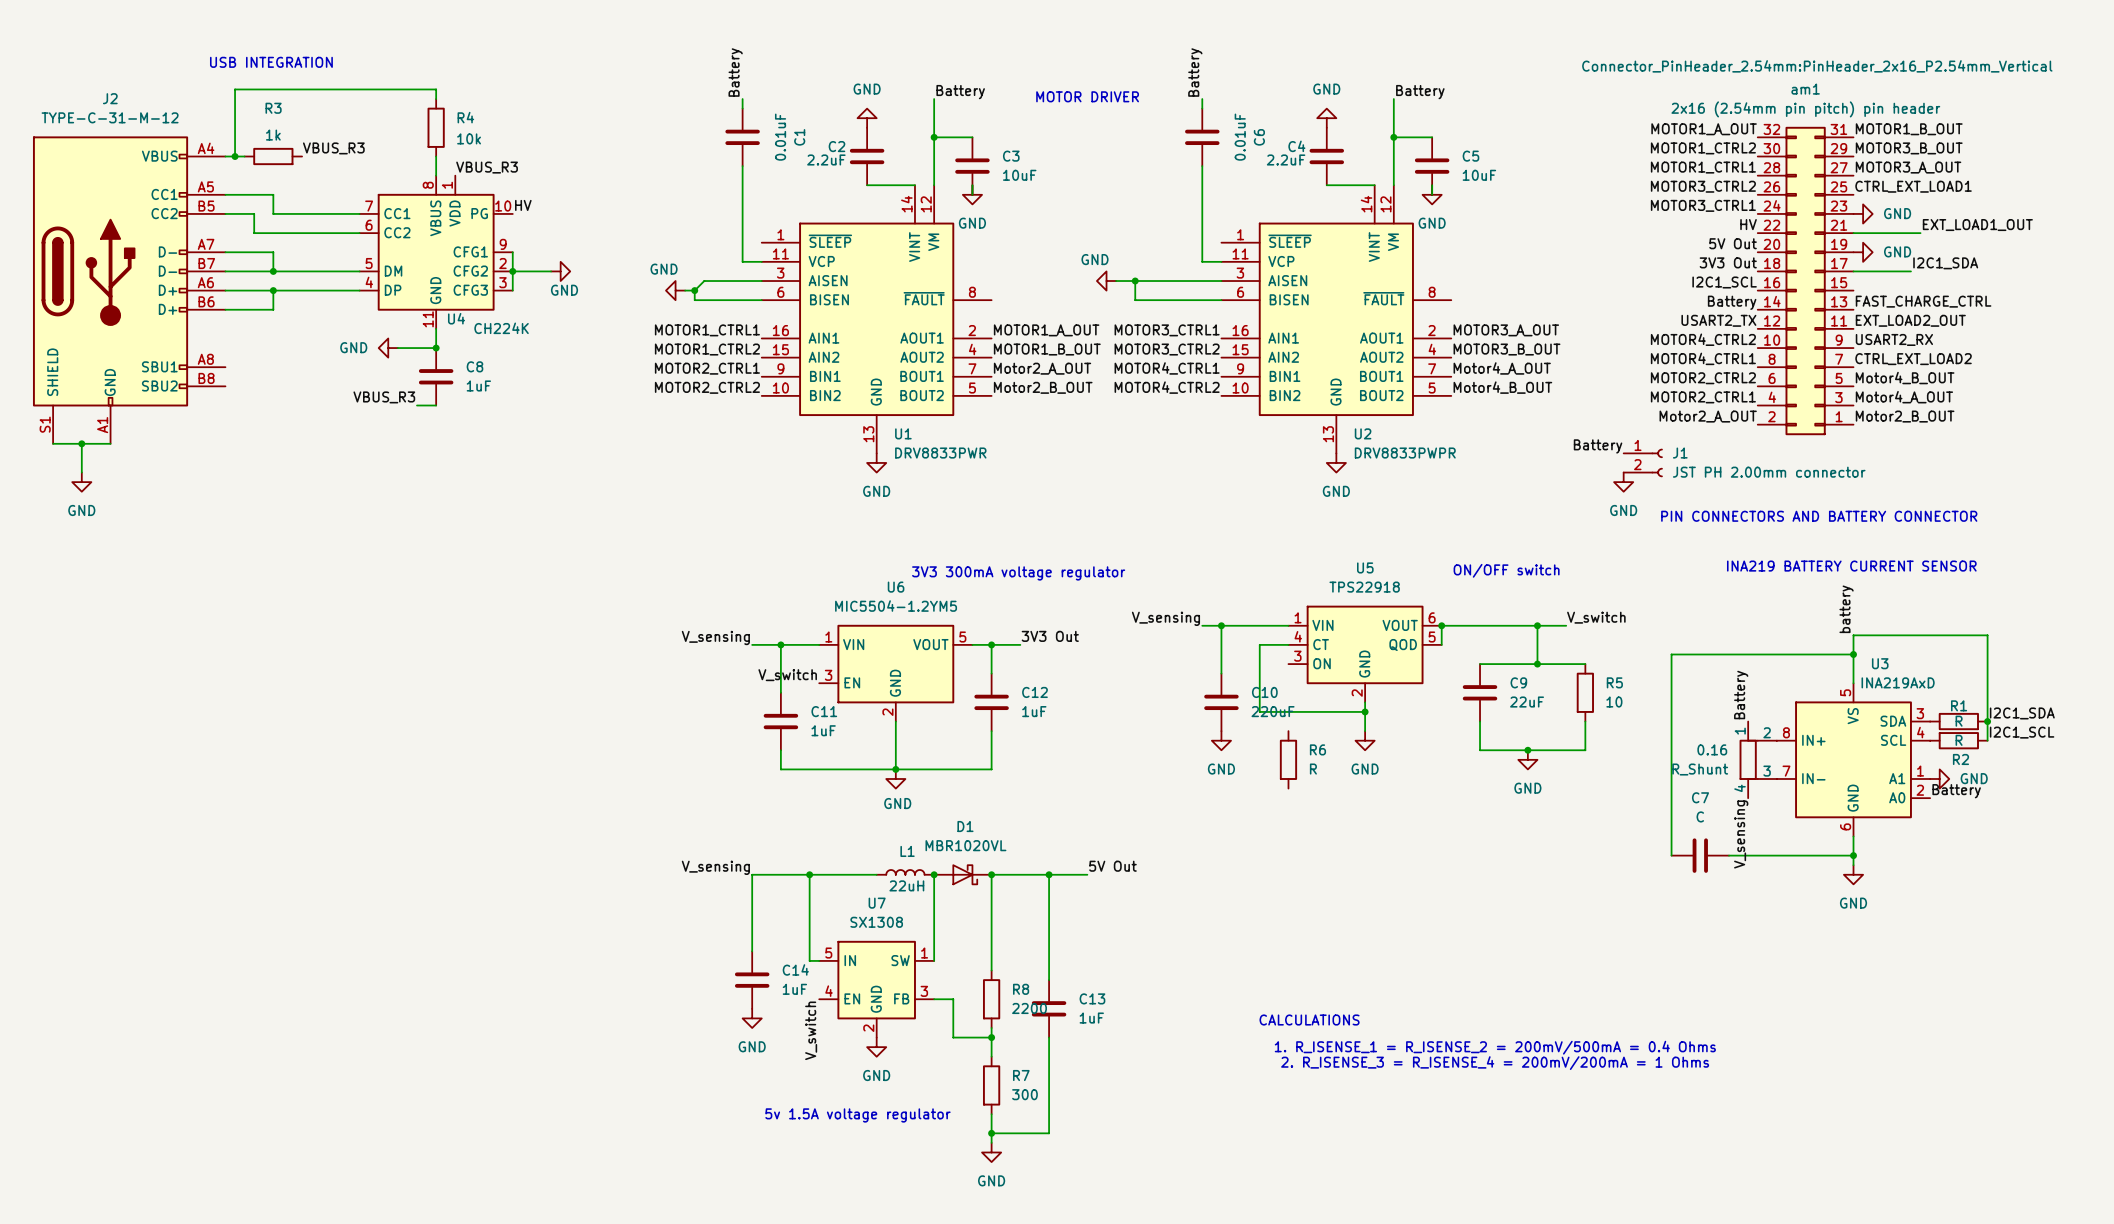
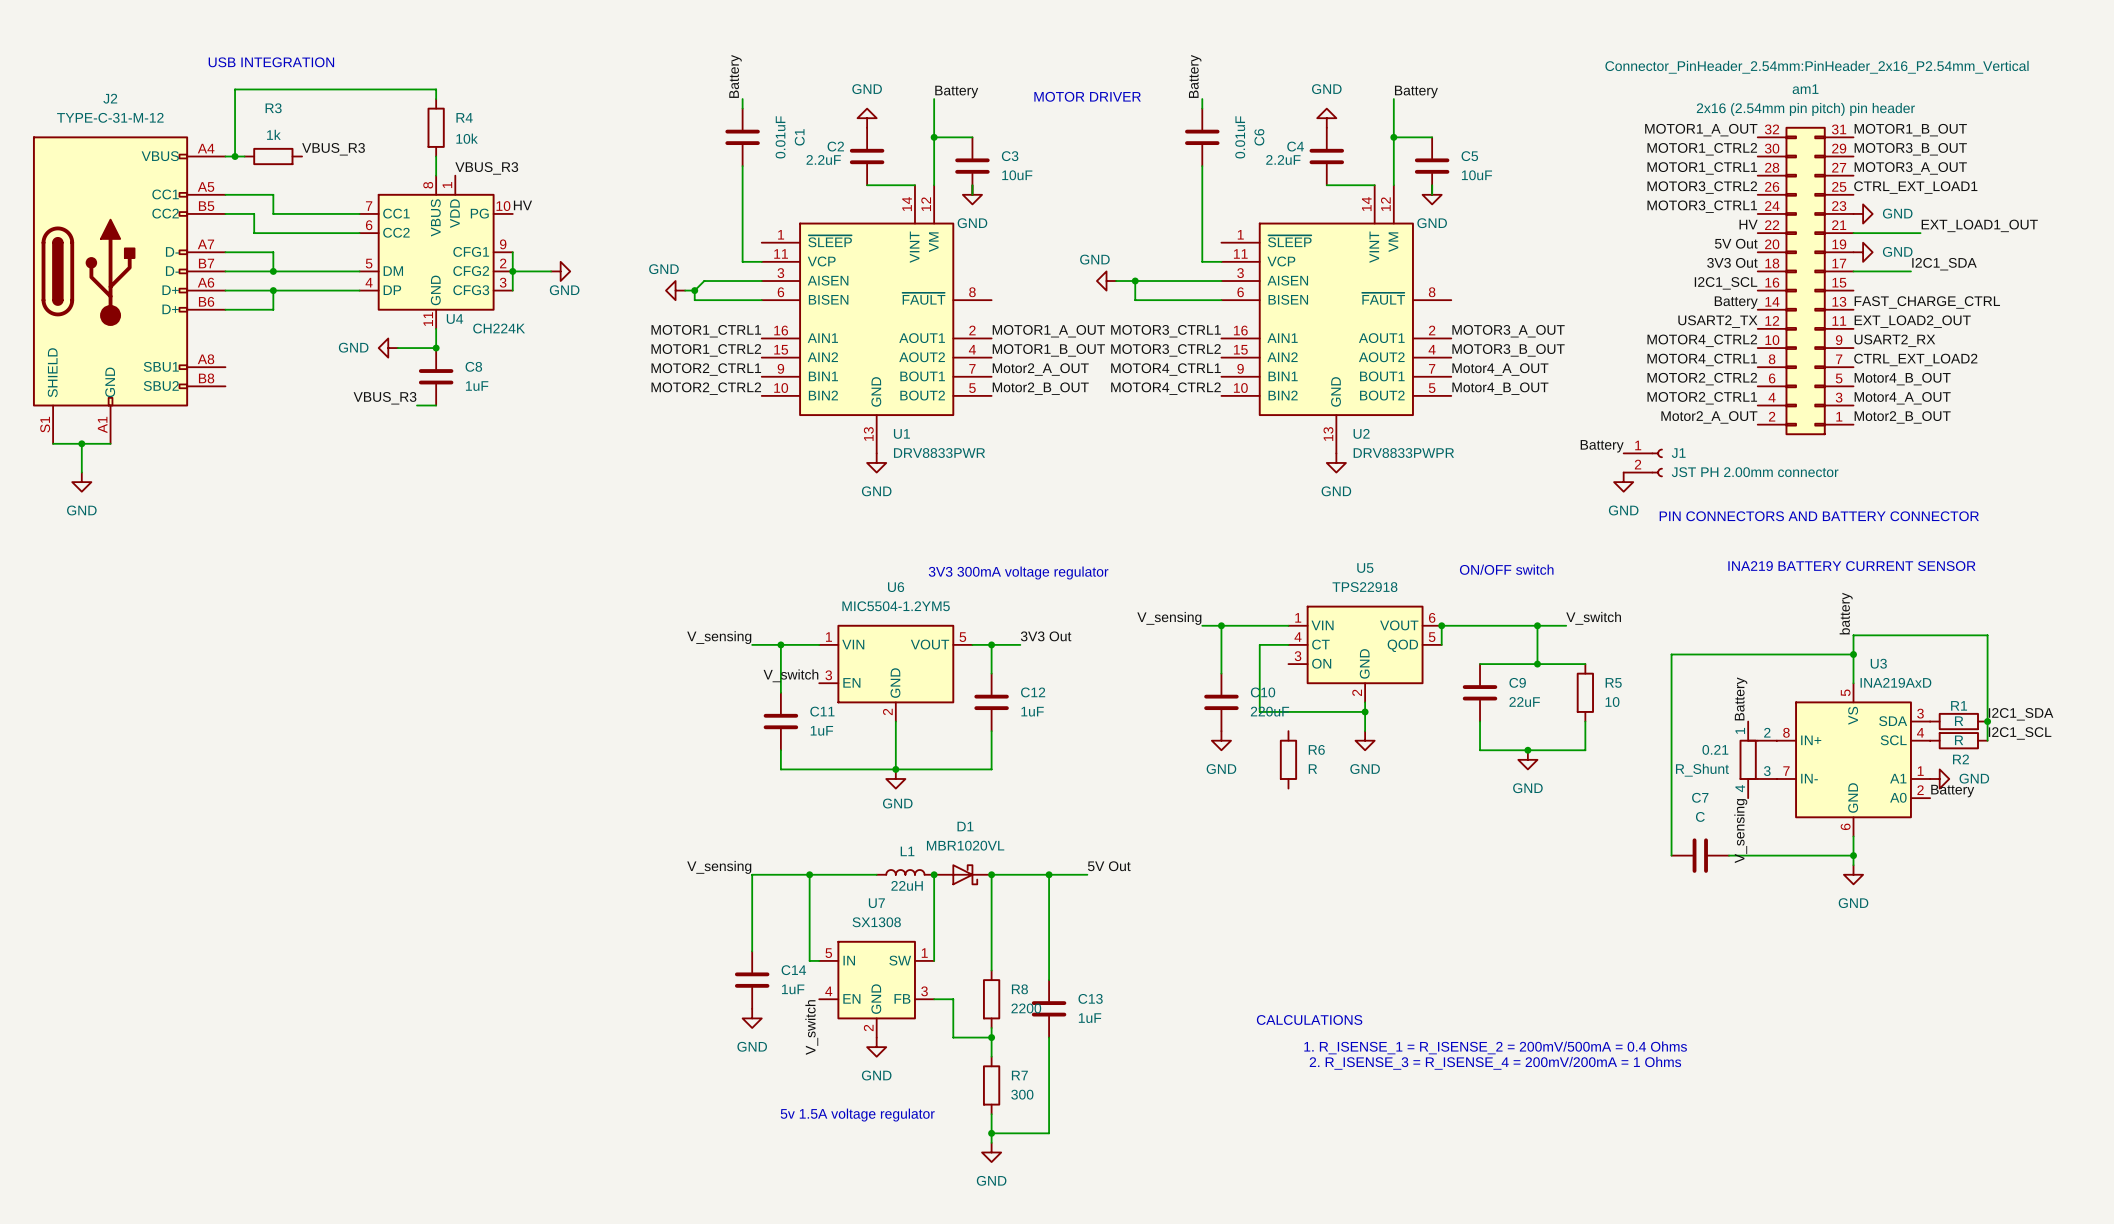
0.16 name: 0.16 (1712, 749) -> 0.21 (1715, 749)

